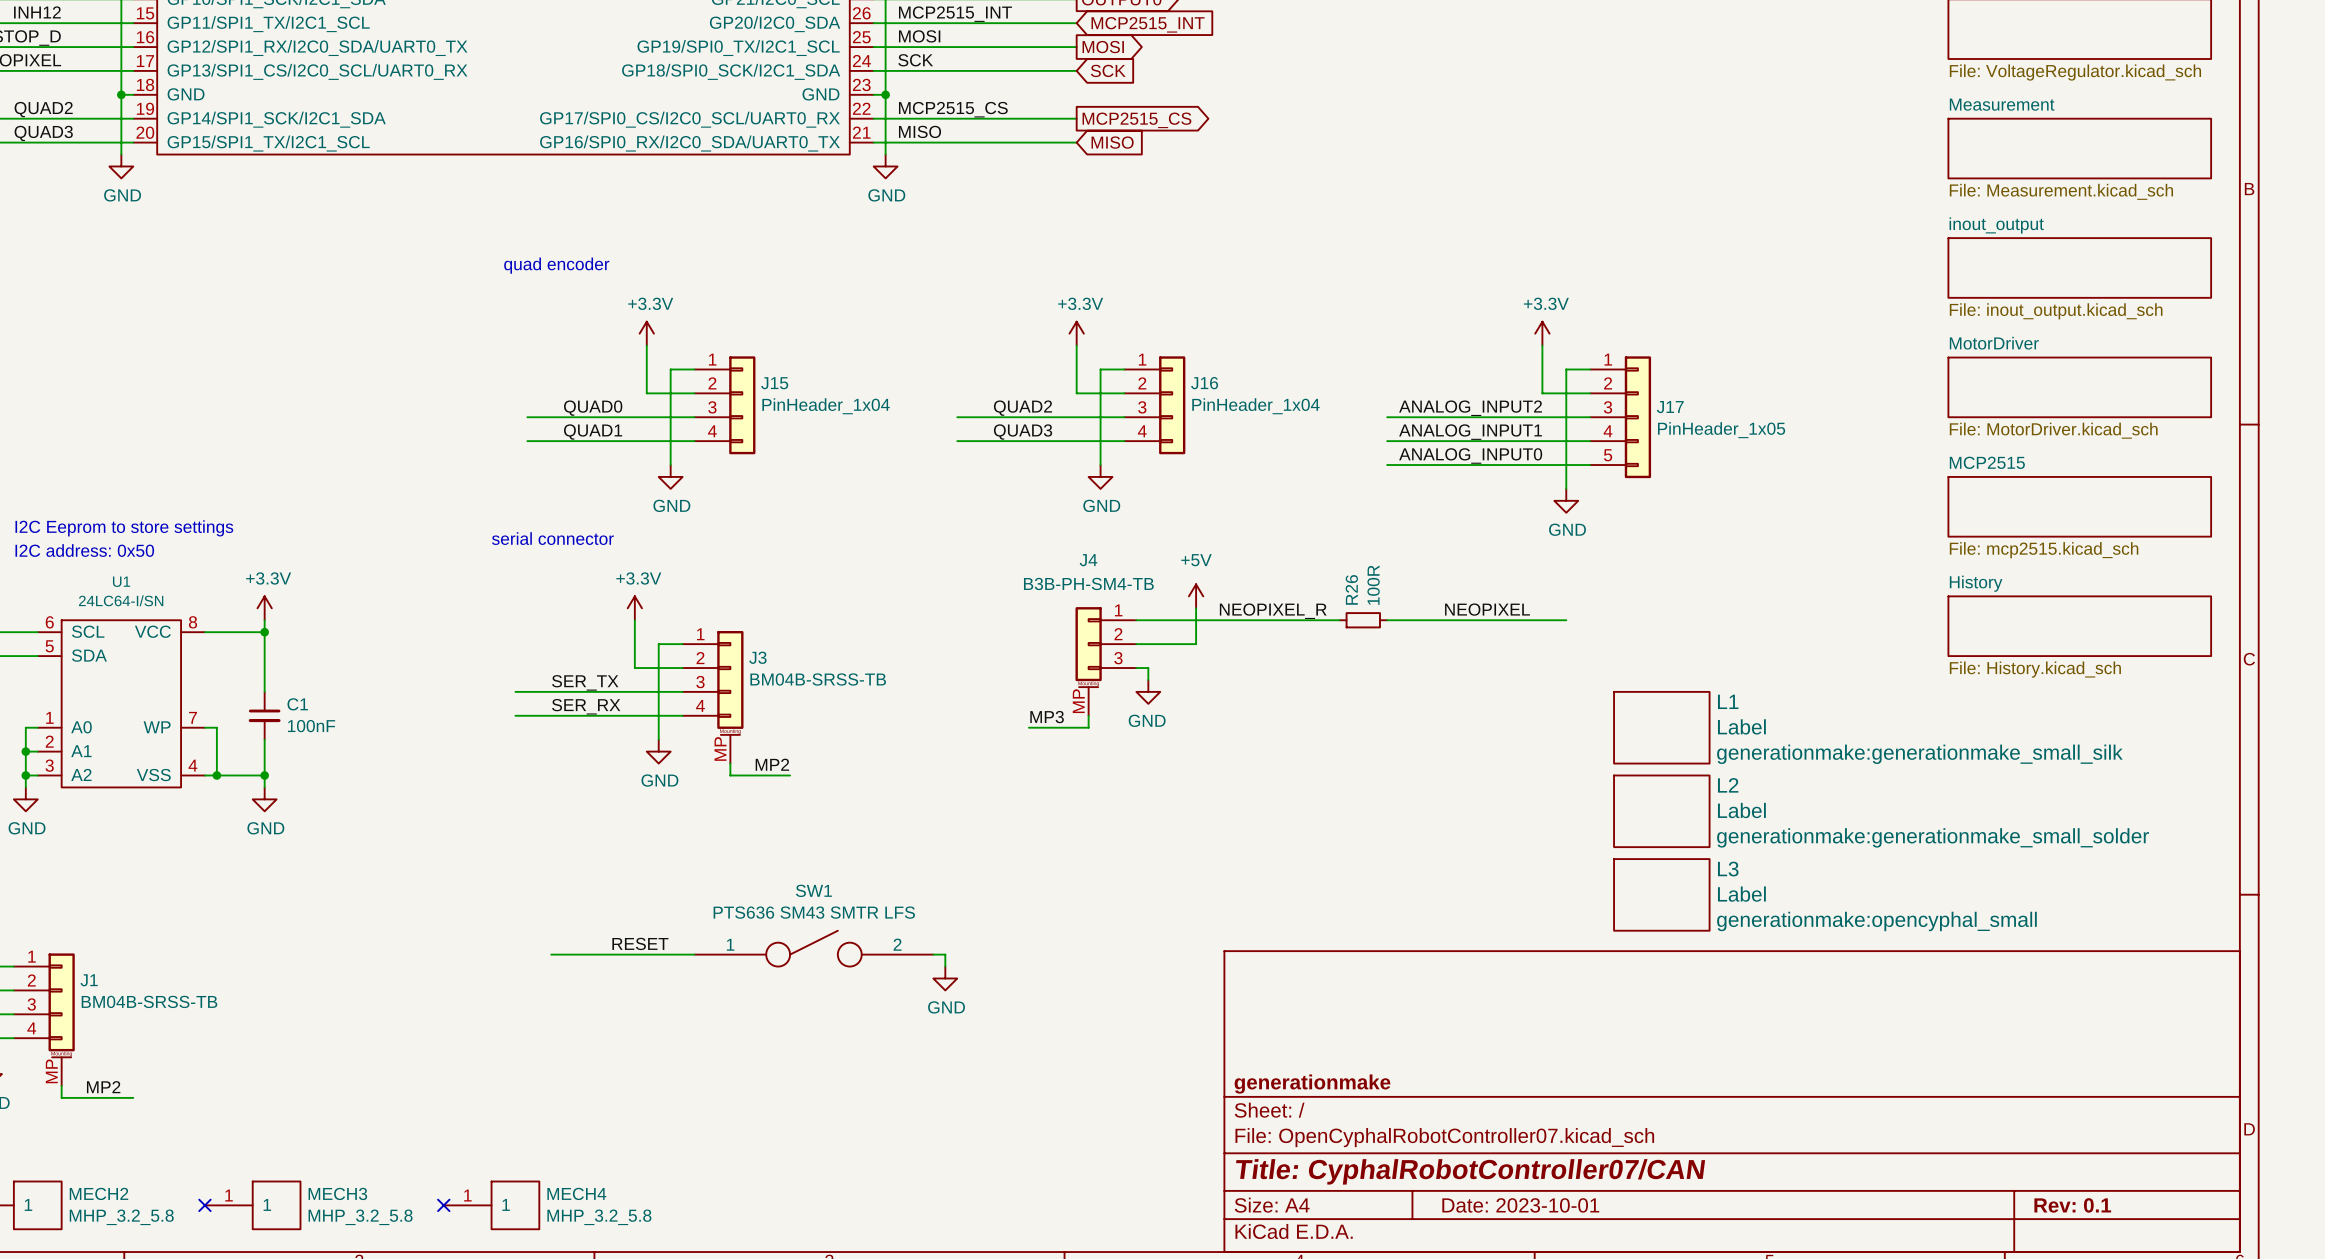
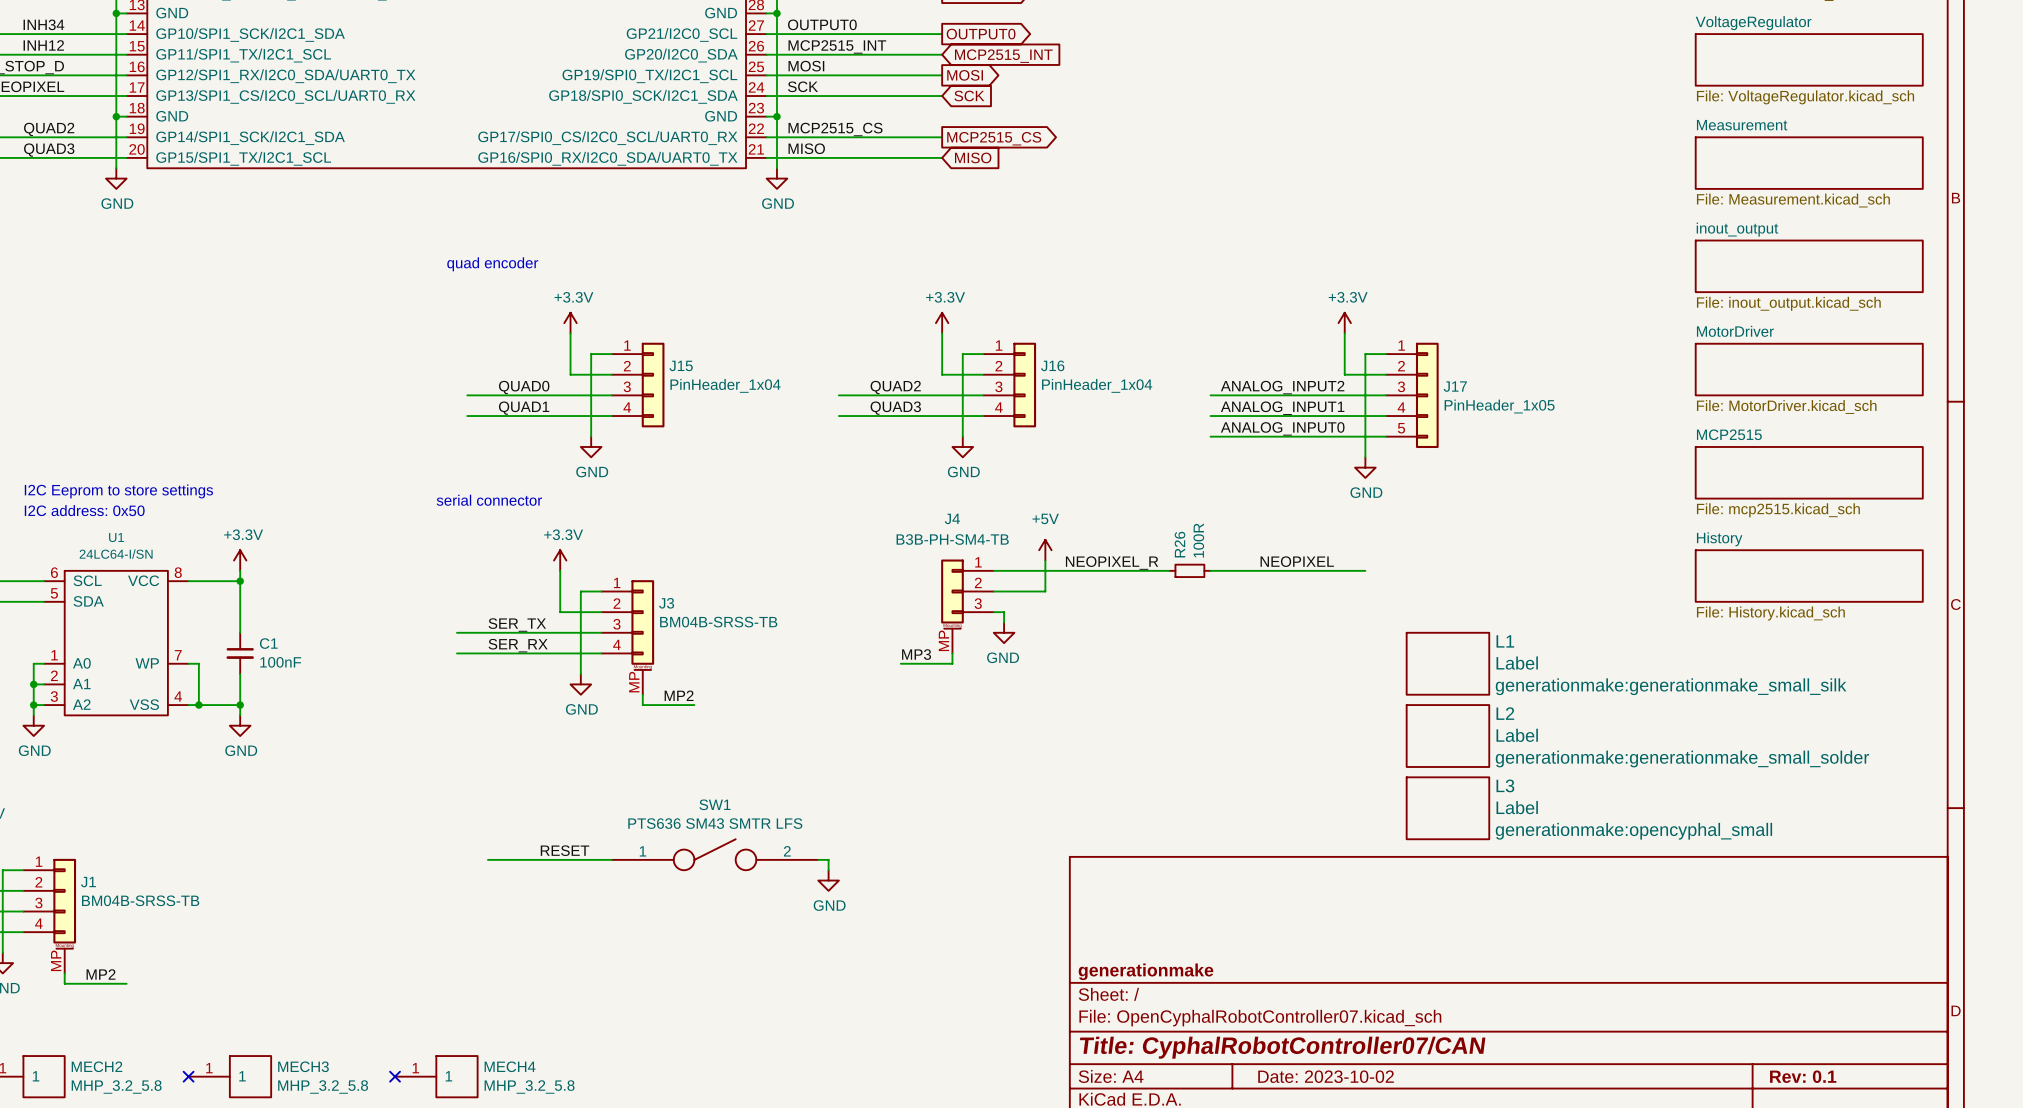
title block: Date: 2023-10-01 (1520, 1205) -> Date: 2023-10-02 (1326, 1076)

